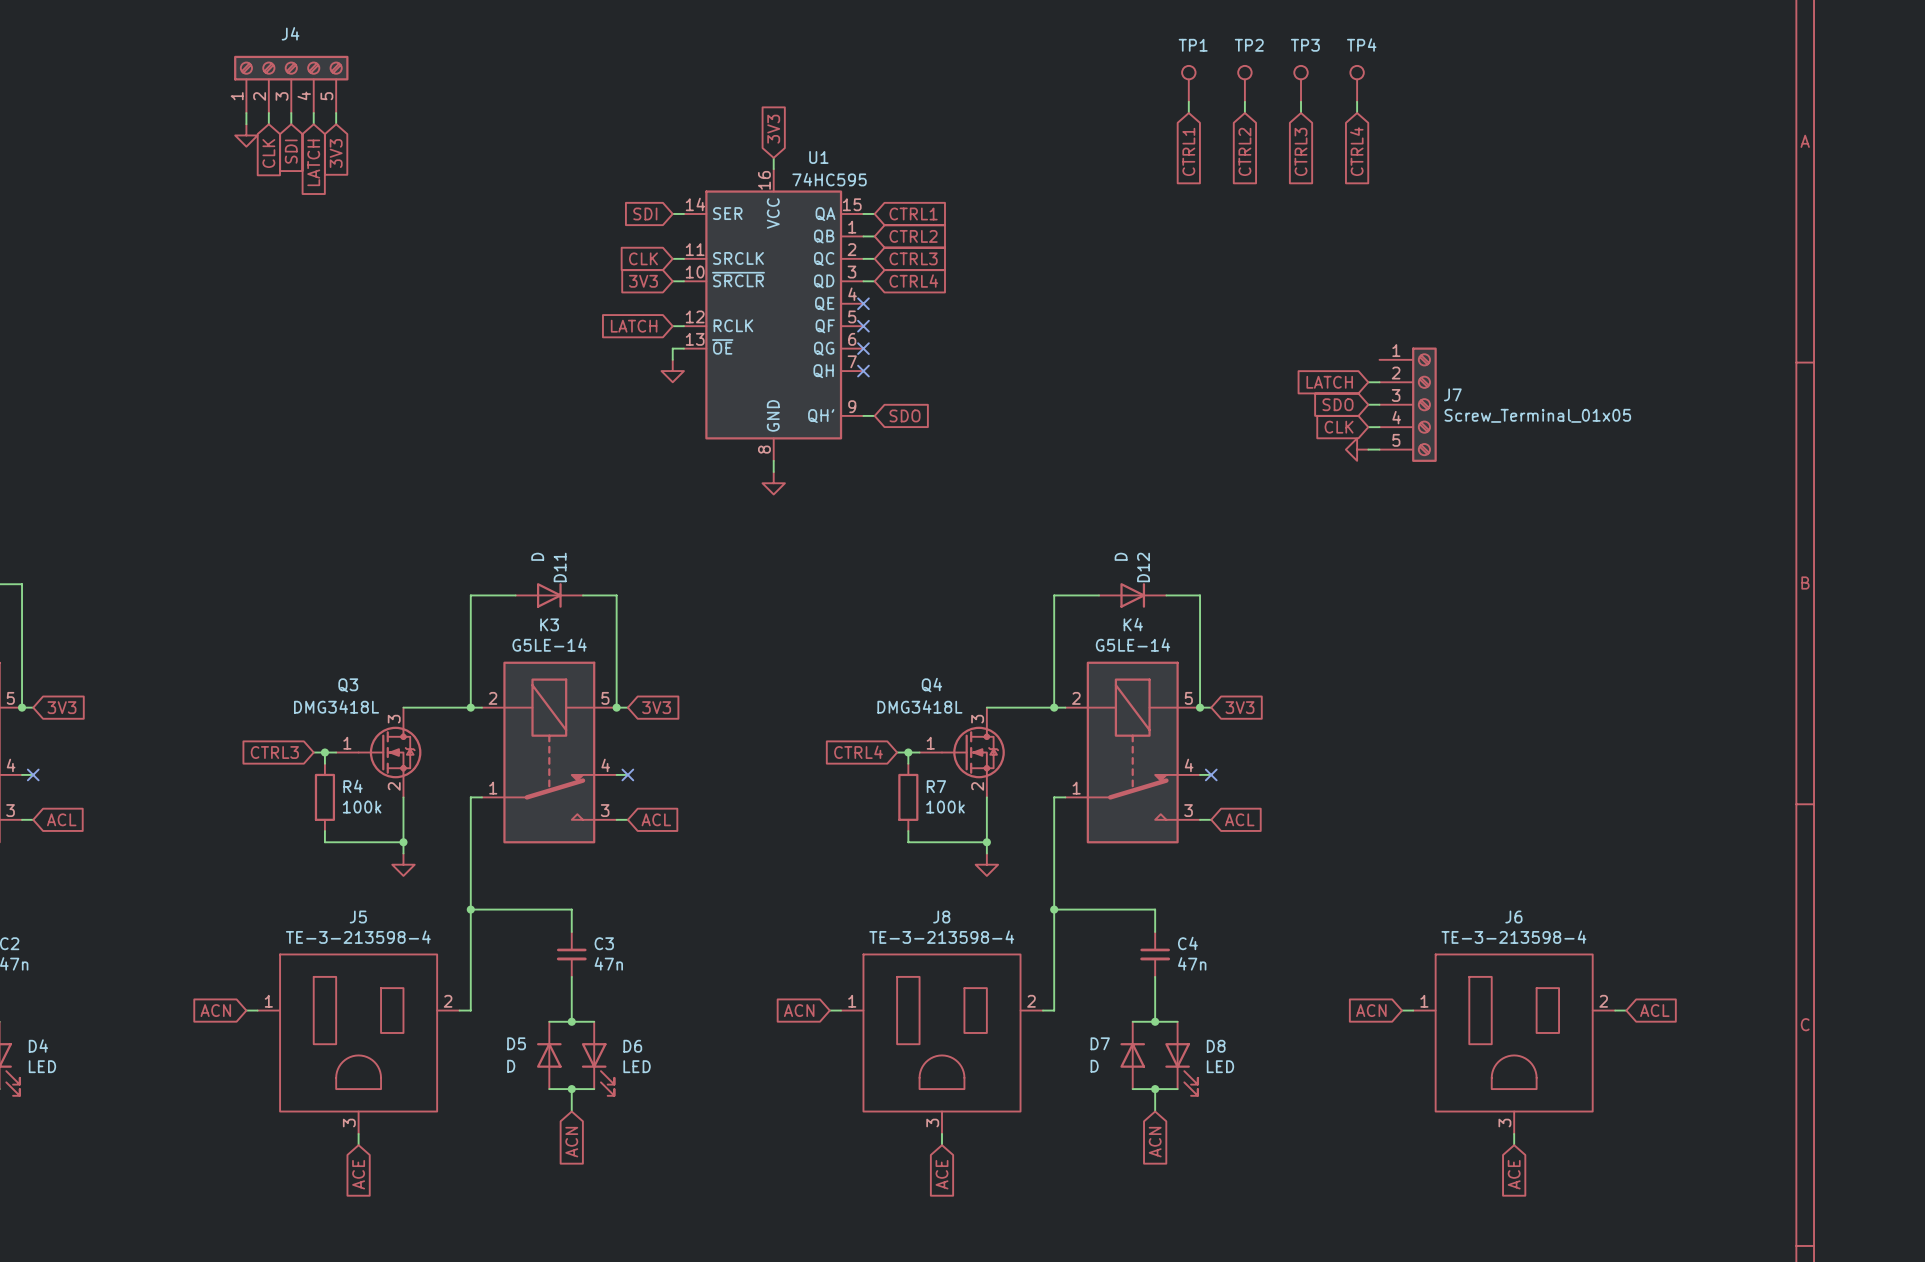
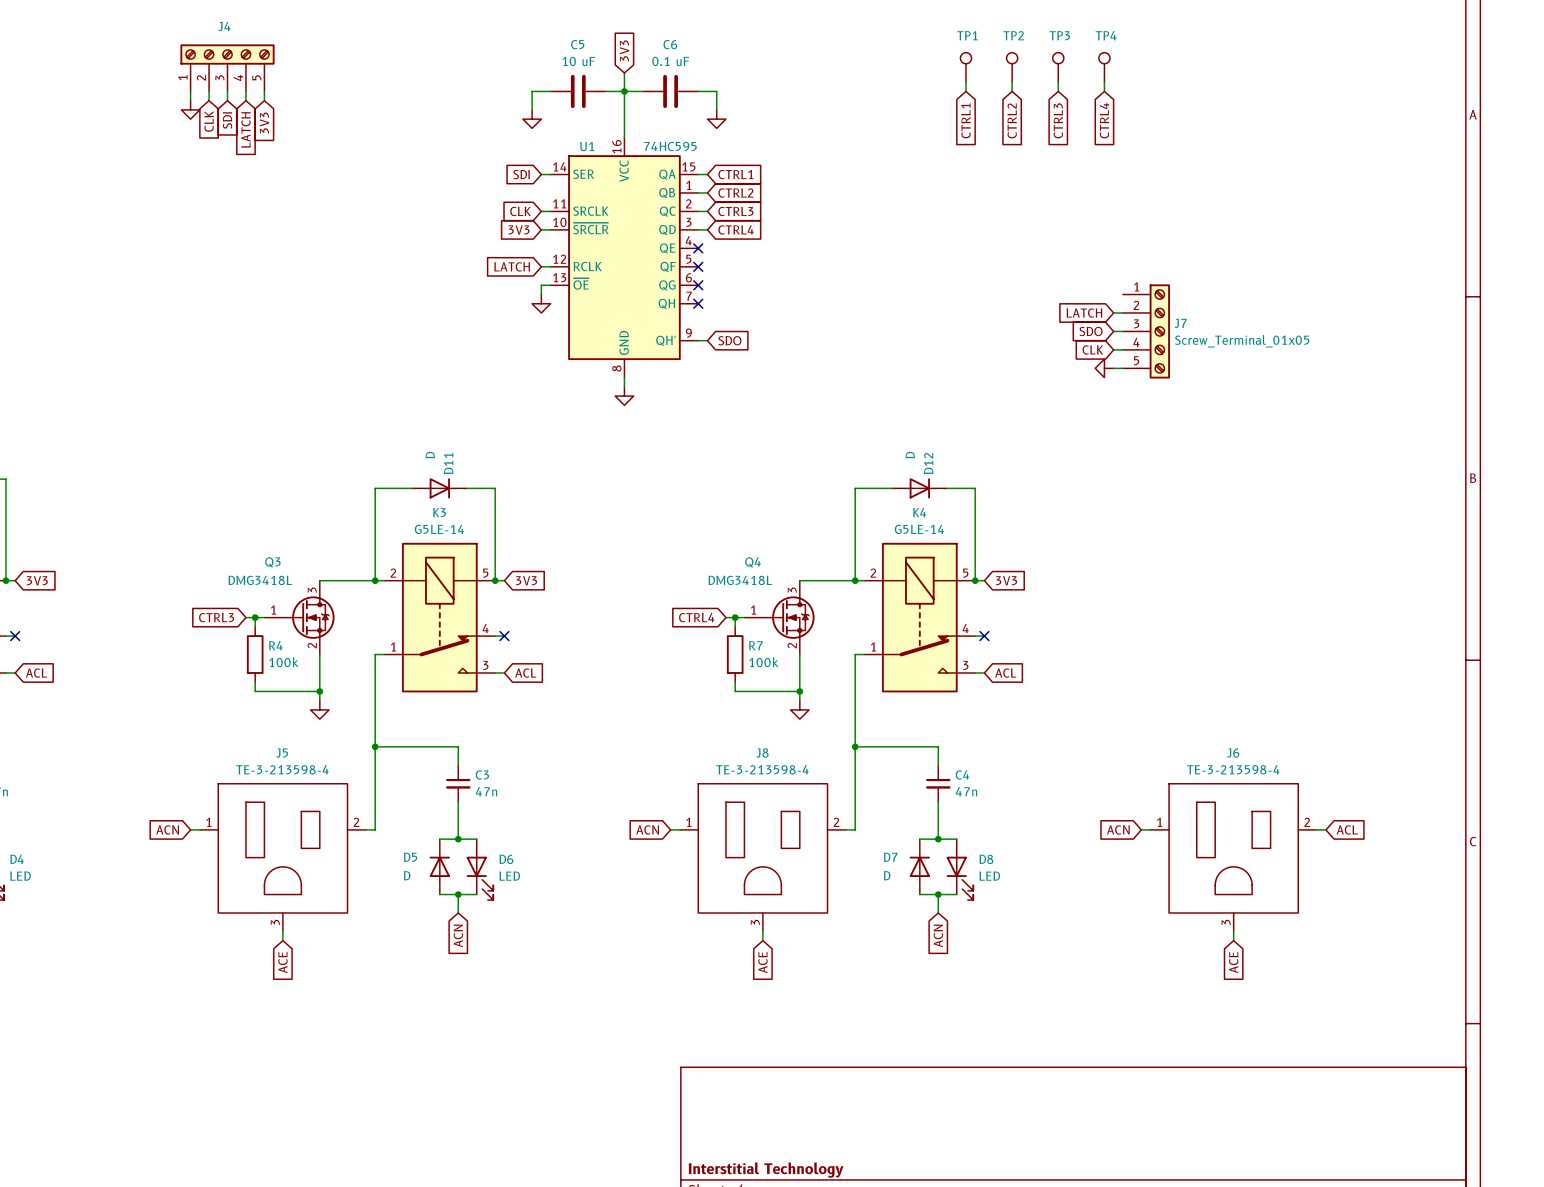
wire: none -> (624, 72) (624, 128)
wire: none -> (550, 91) (532, 91) (532, 109)
C5: none -> 10 uF (578, 91)
wire: none -> (605, 91) (642, 91)
junction: none -> (624, 91)
C6: none -> 0.1 uF (670, 91)
wire: none -> (698, 91) (716, 91) (716, 109)
global label position: 3V3 (773, 129) -> 3V3 (624, 50)
power symbol: none -> (532, 119)
power symbol: none -> (716, 119)
U1 name position: U1 (818, 157) -> U1 (587, 146)

